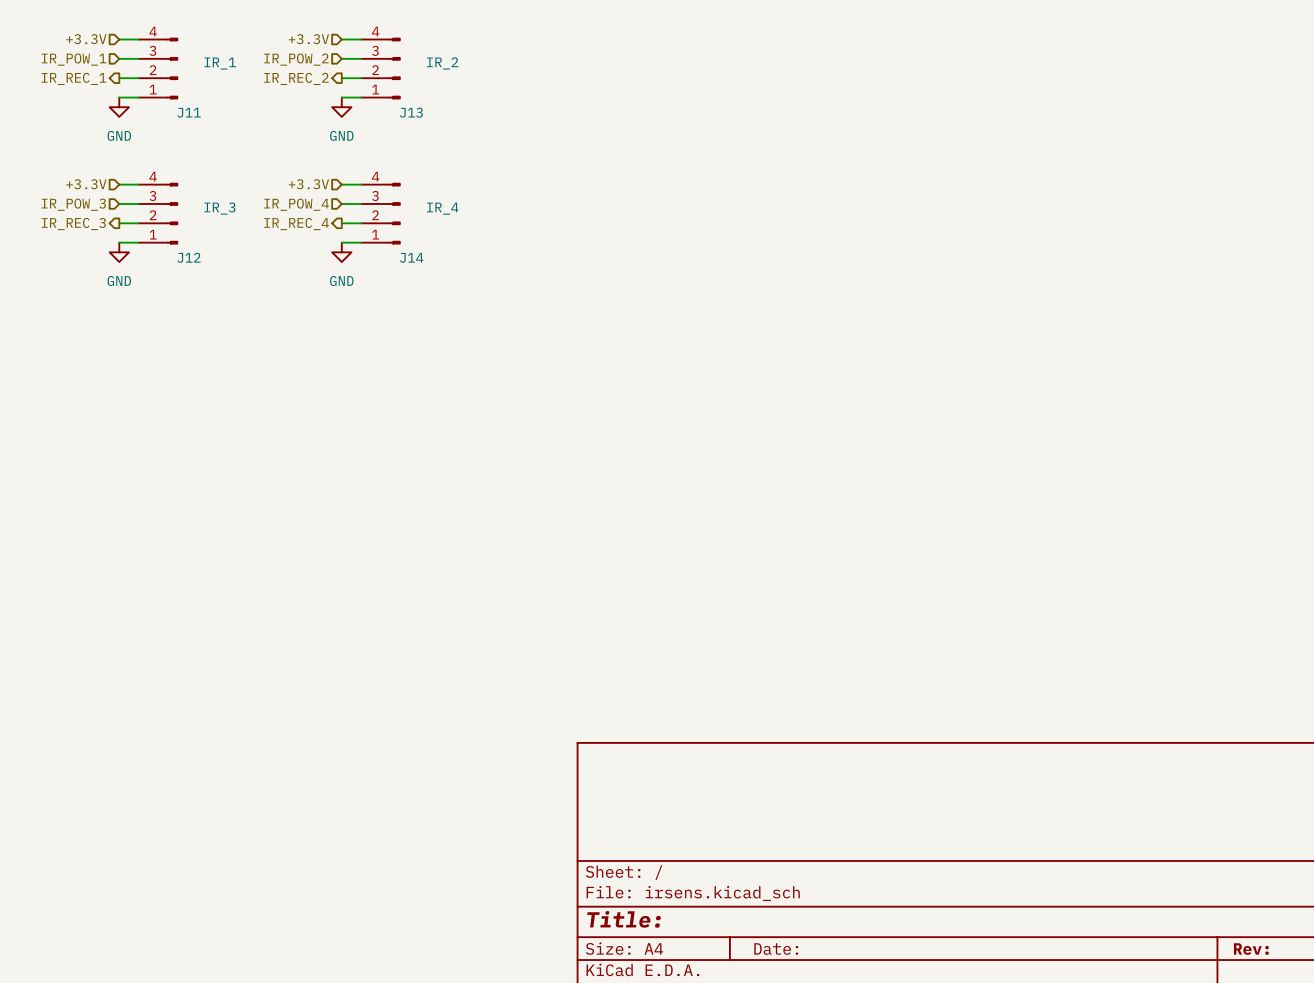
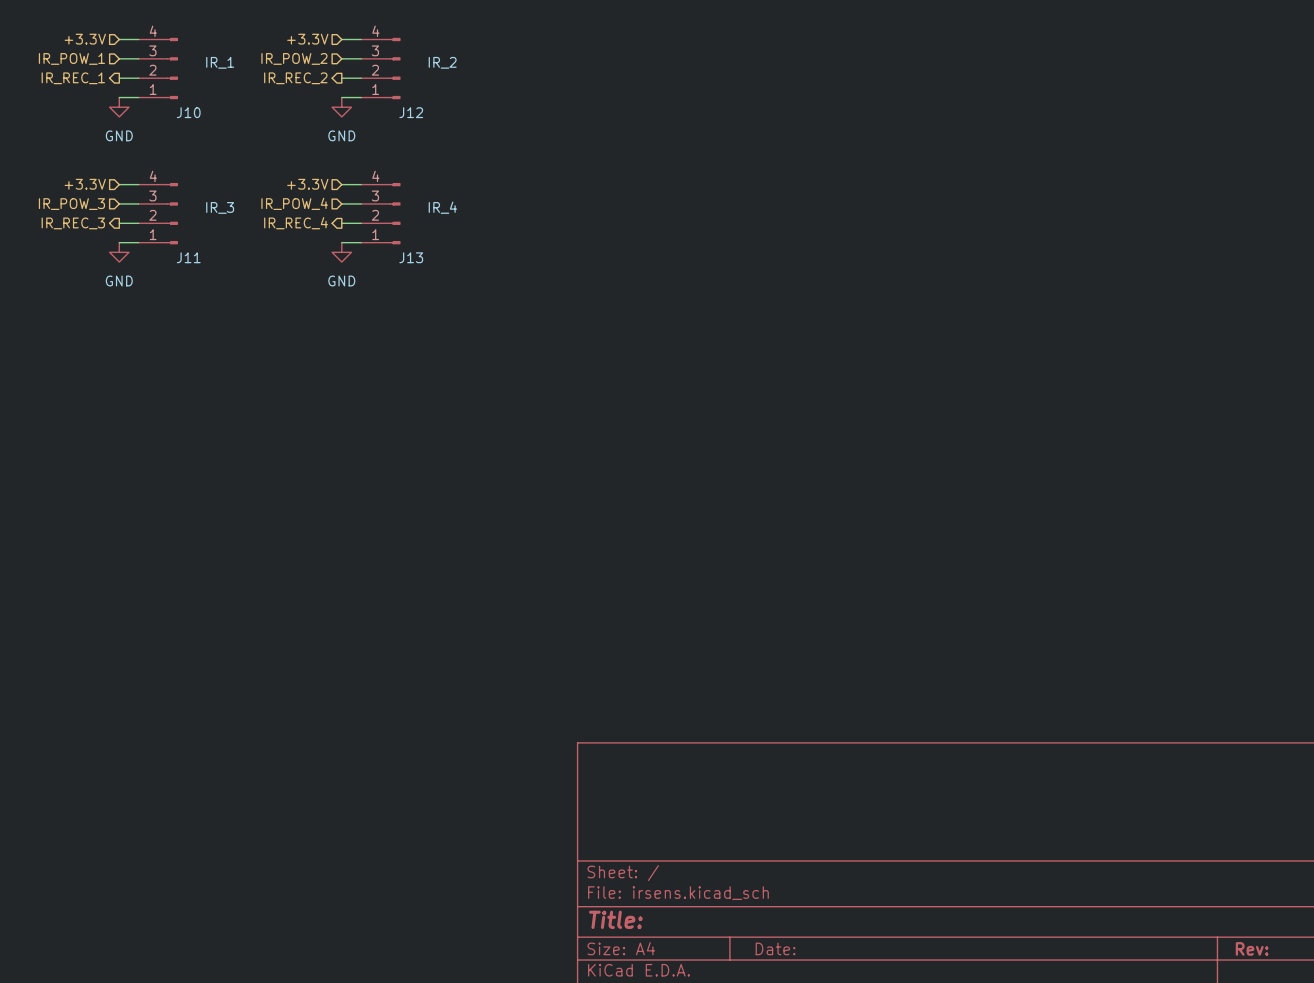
J11 name: J11 (189, 112) -> J10 (188, 112)
J13 name: J13 (411, 112) -> J12 (411, 112)
J12 name: J12 (189, 257) -> J11 (188, 257)
J14 name: J14 (411, 257) -> J13 (411, 257)

